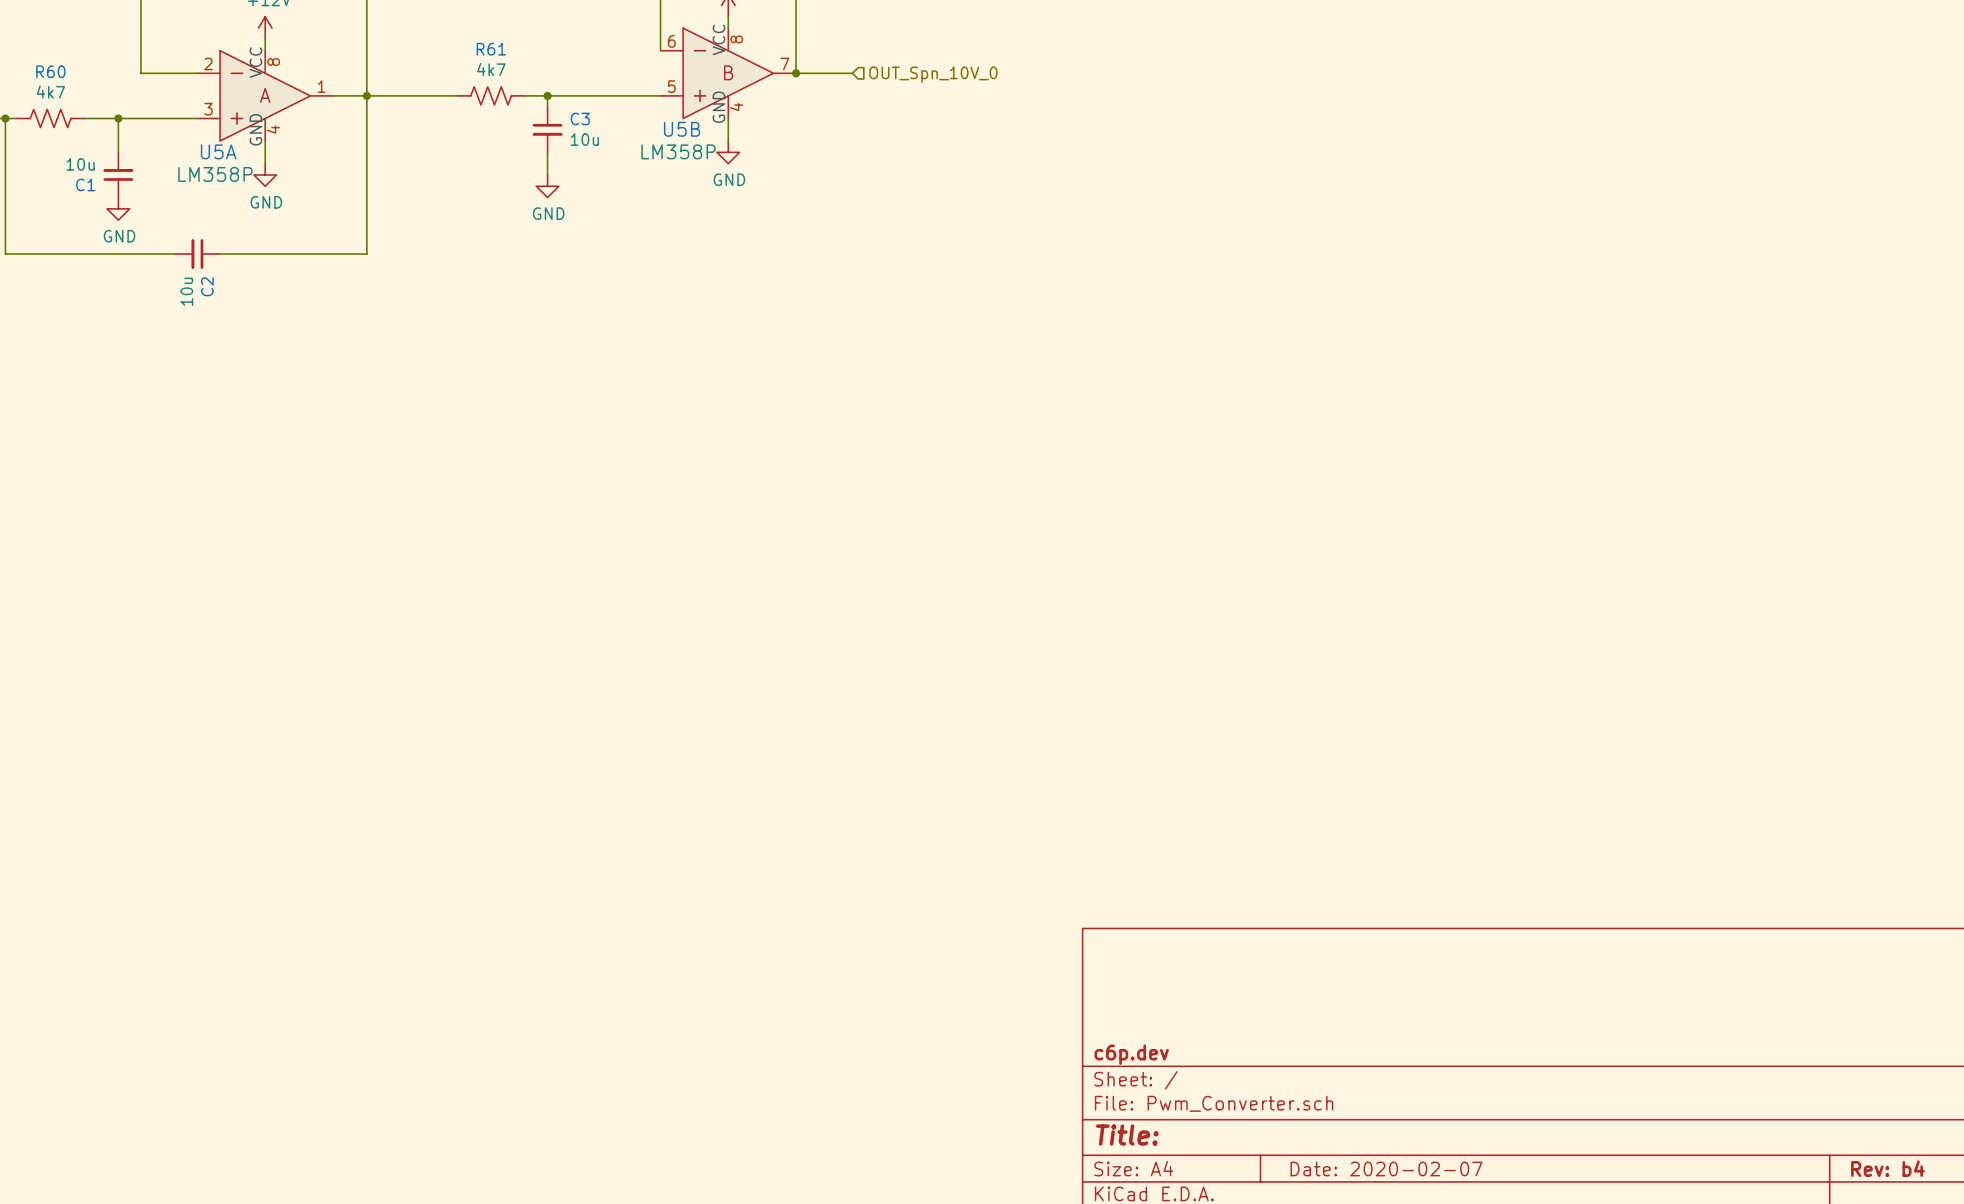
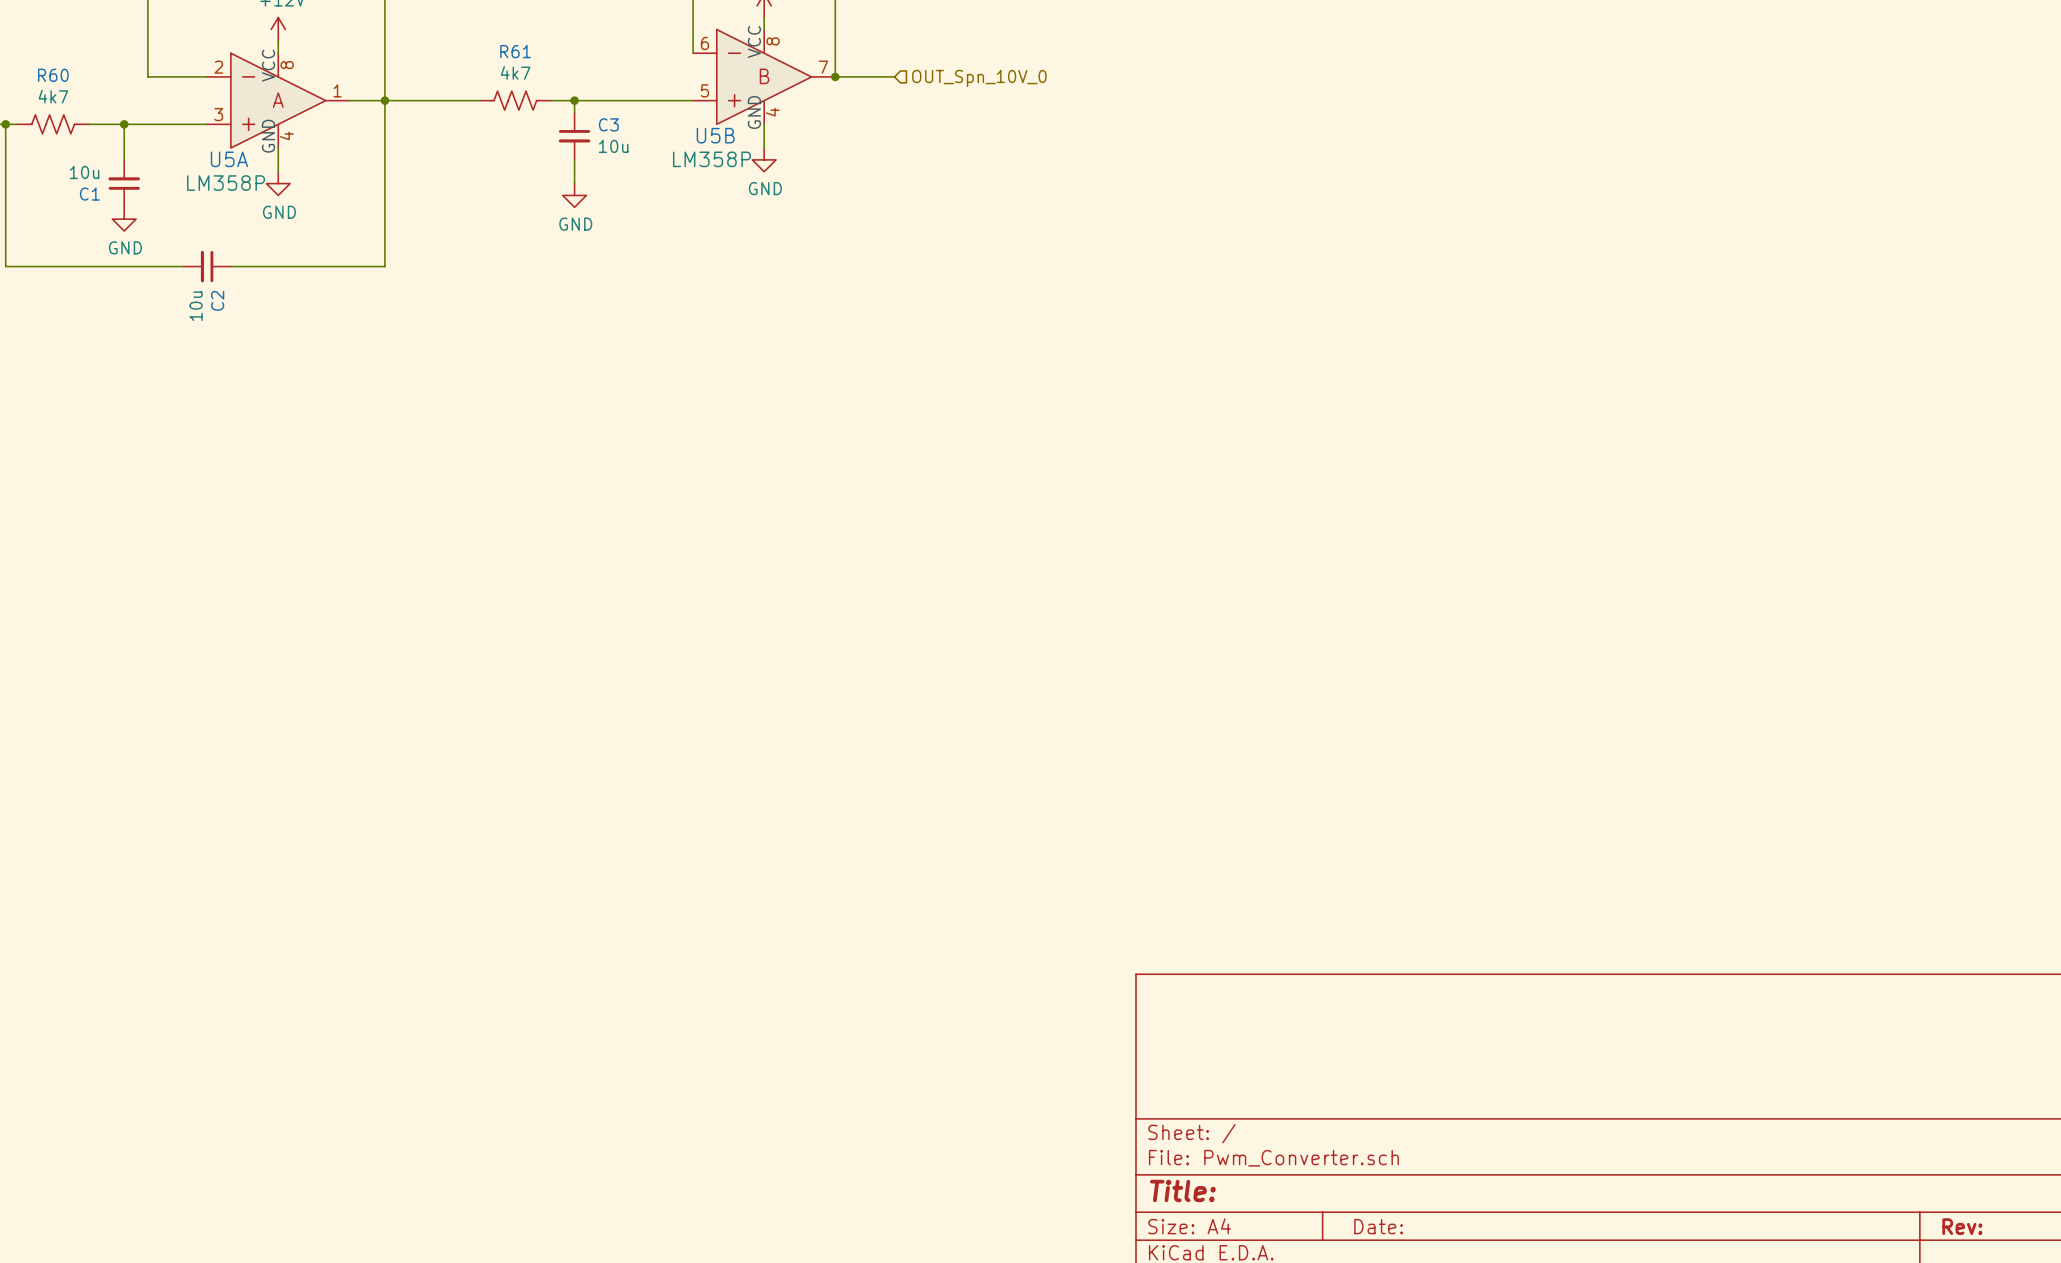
title block: c6p.dev (1131, 1054) -> none
title block: Rev: b4 (1887, 1168) -> Rev: (1962, 1226)
title block: Date: 2020-02-07 (1386, 1169) -> Date: (1378, 1226)

